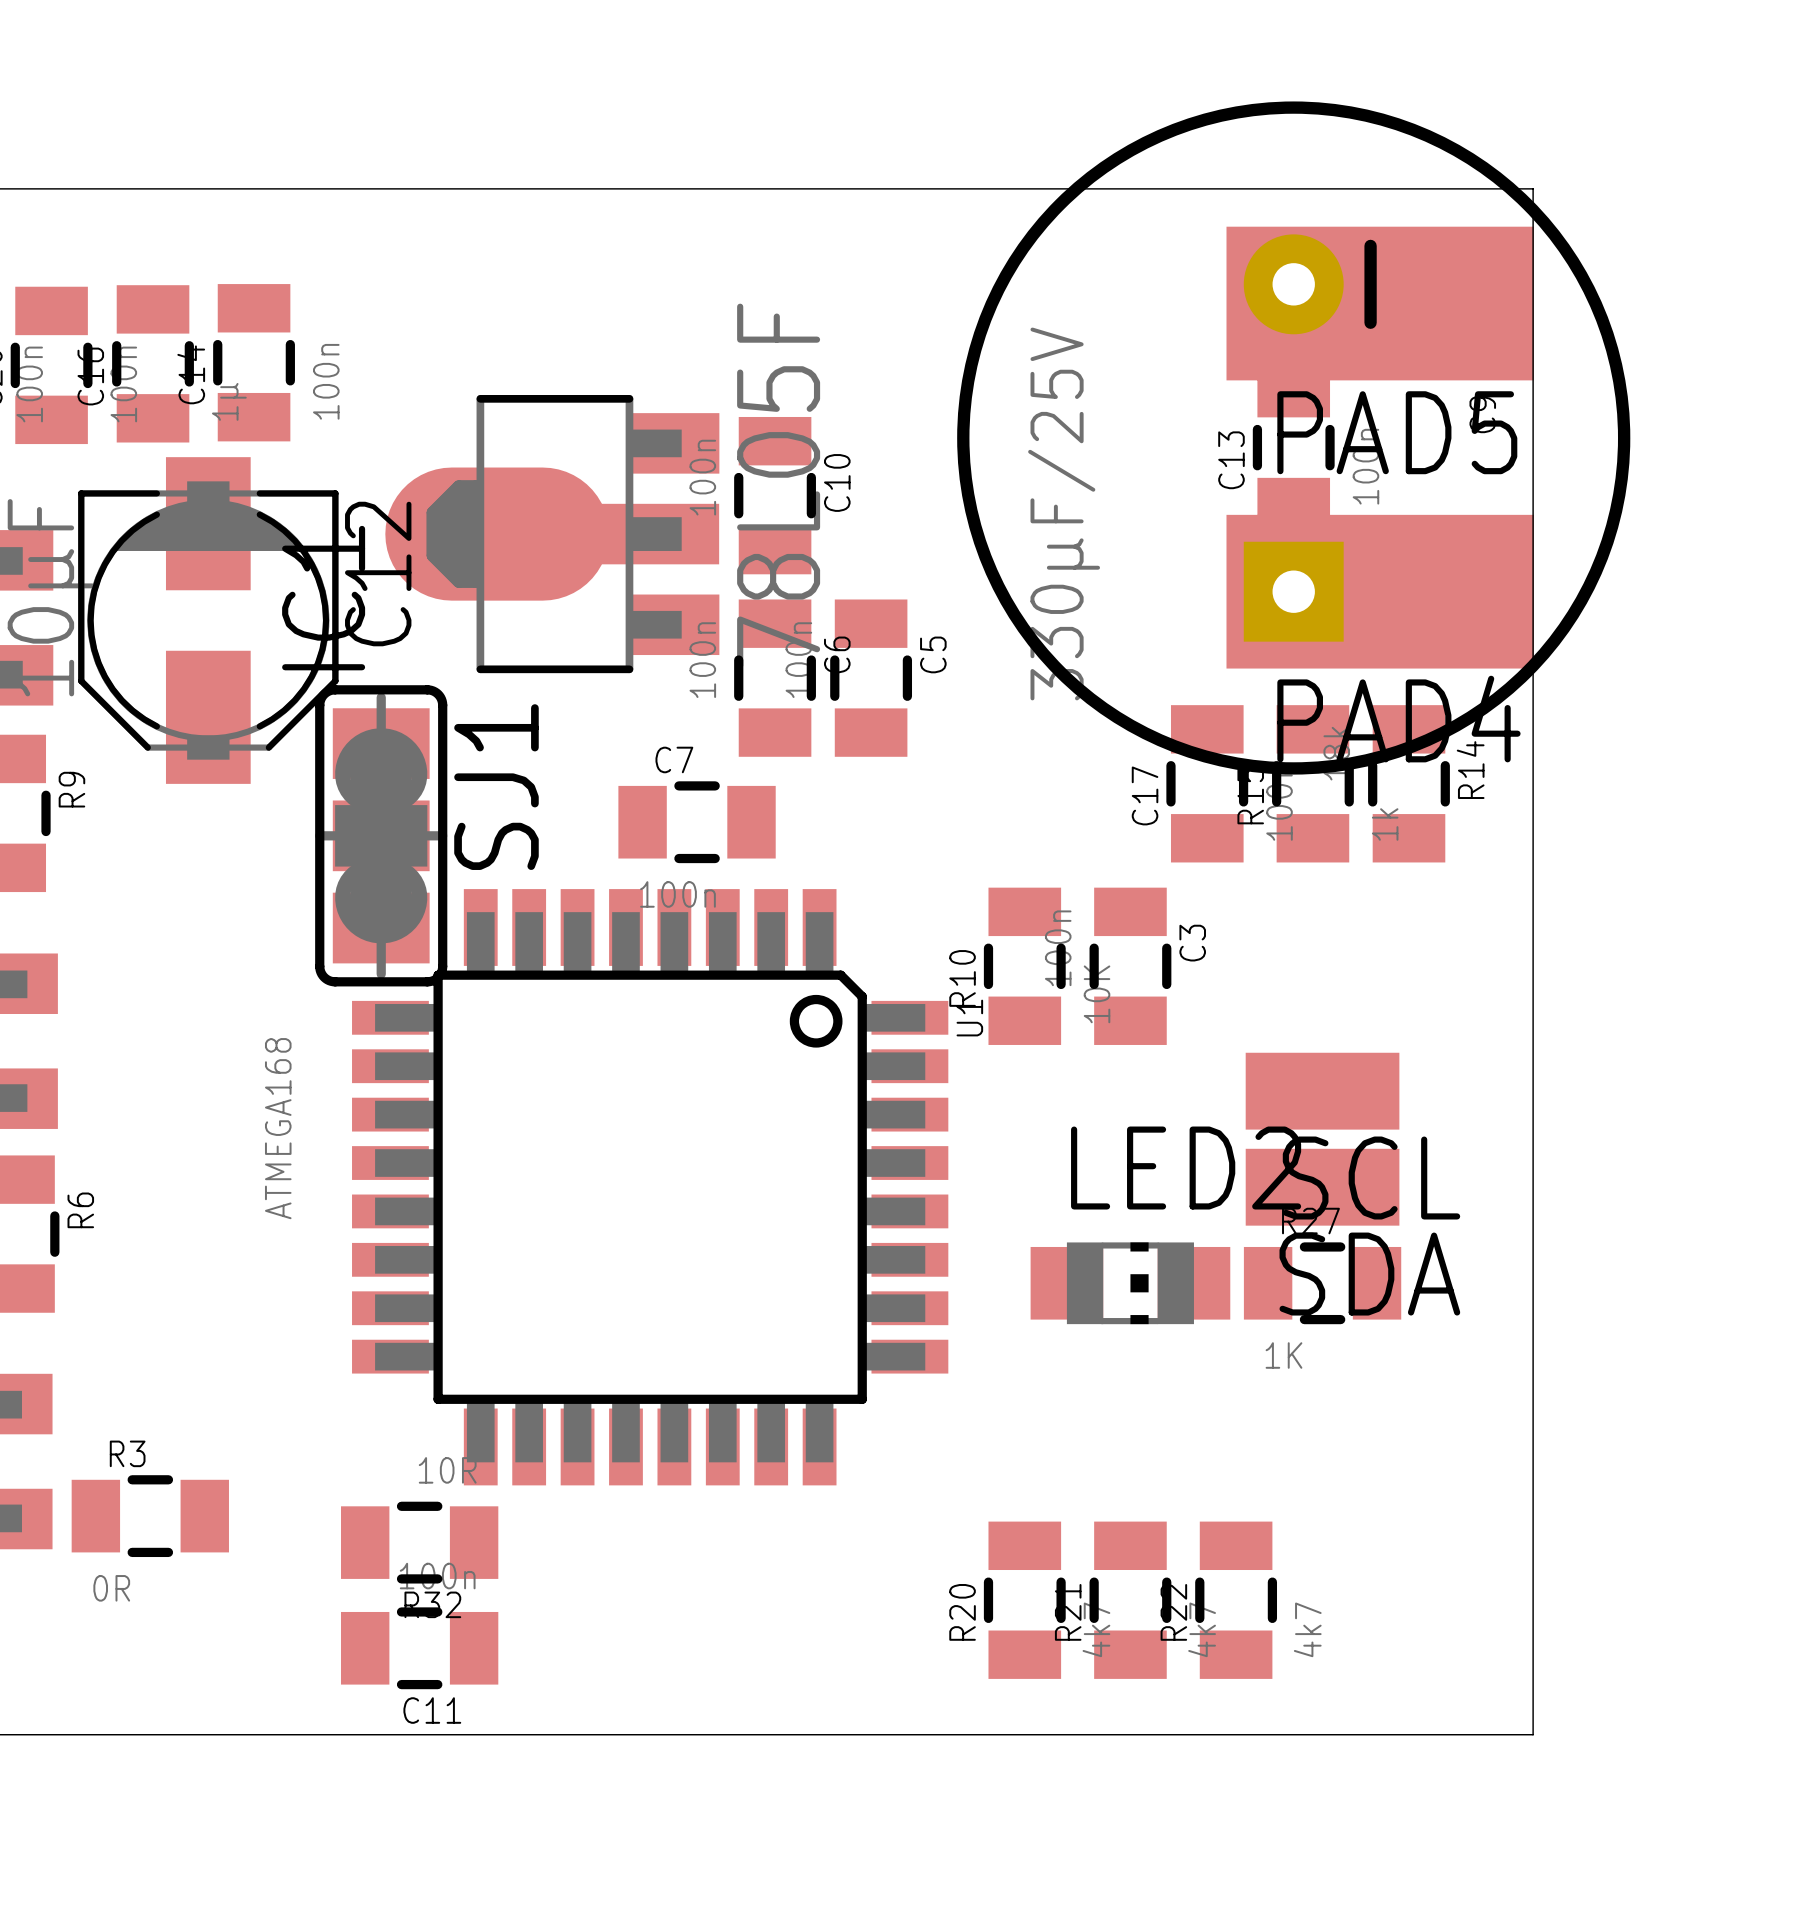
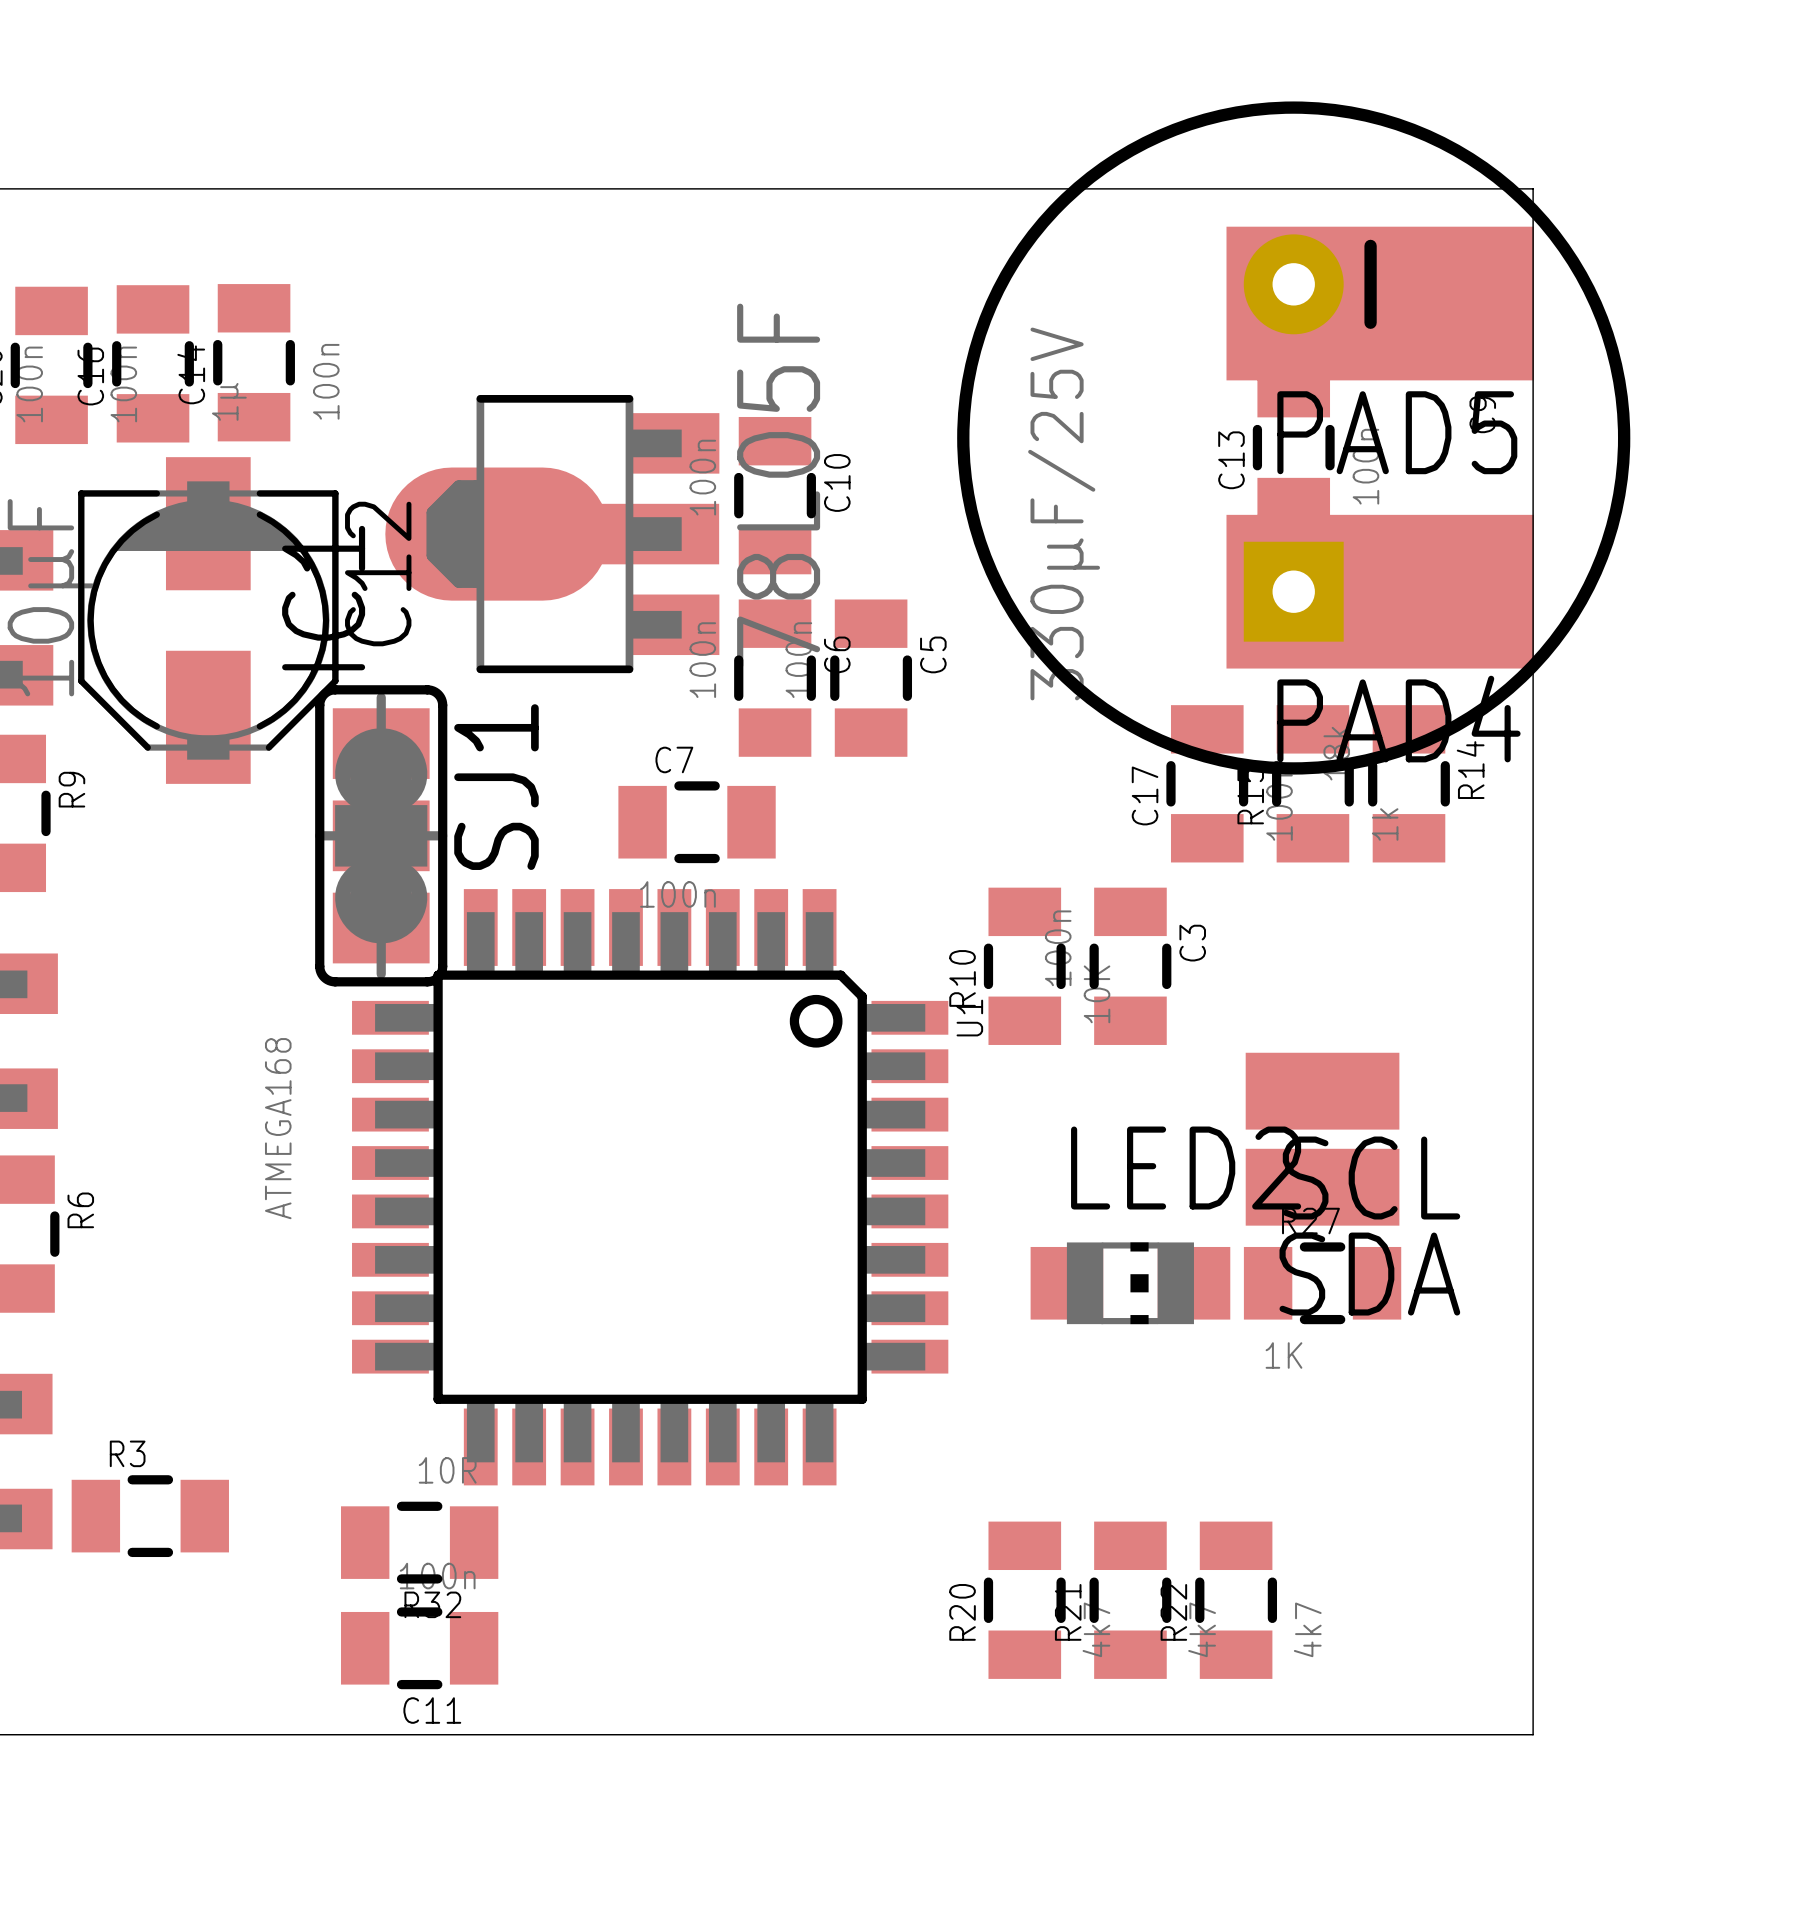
R3 value: 0R (111, 1588) -> none

